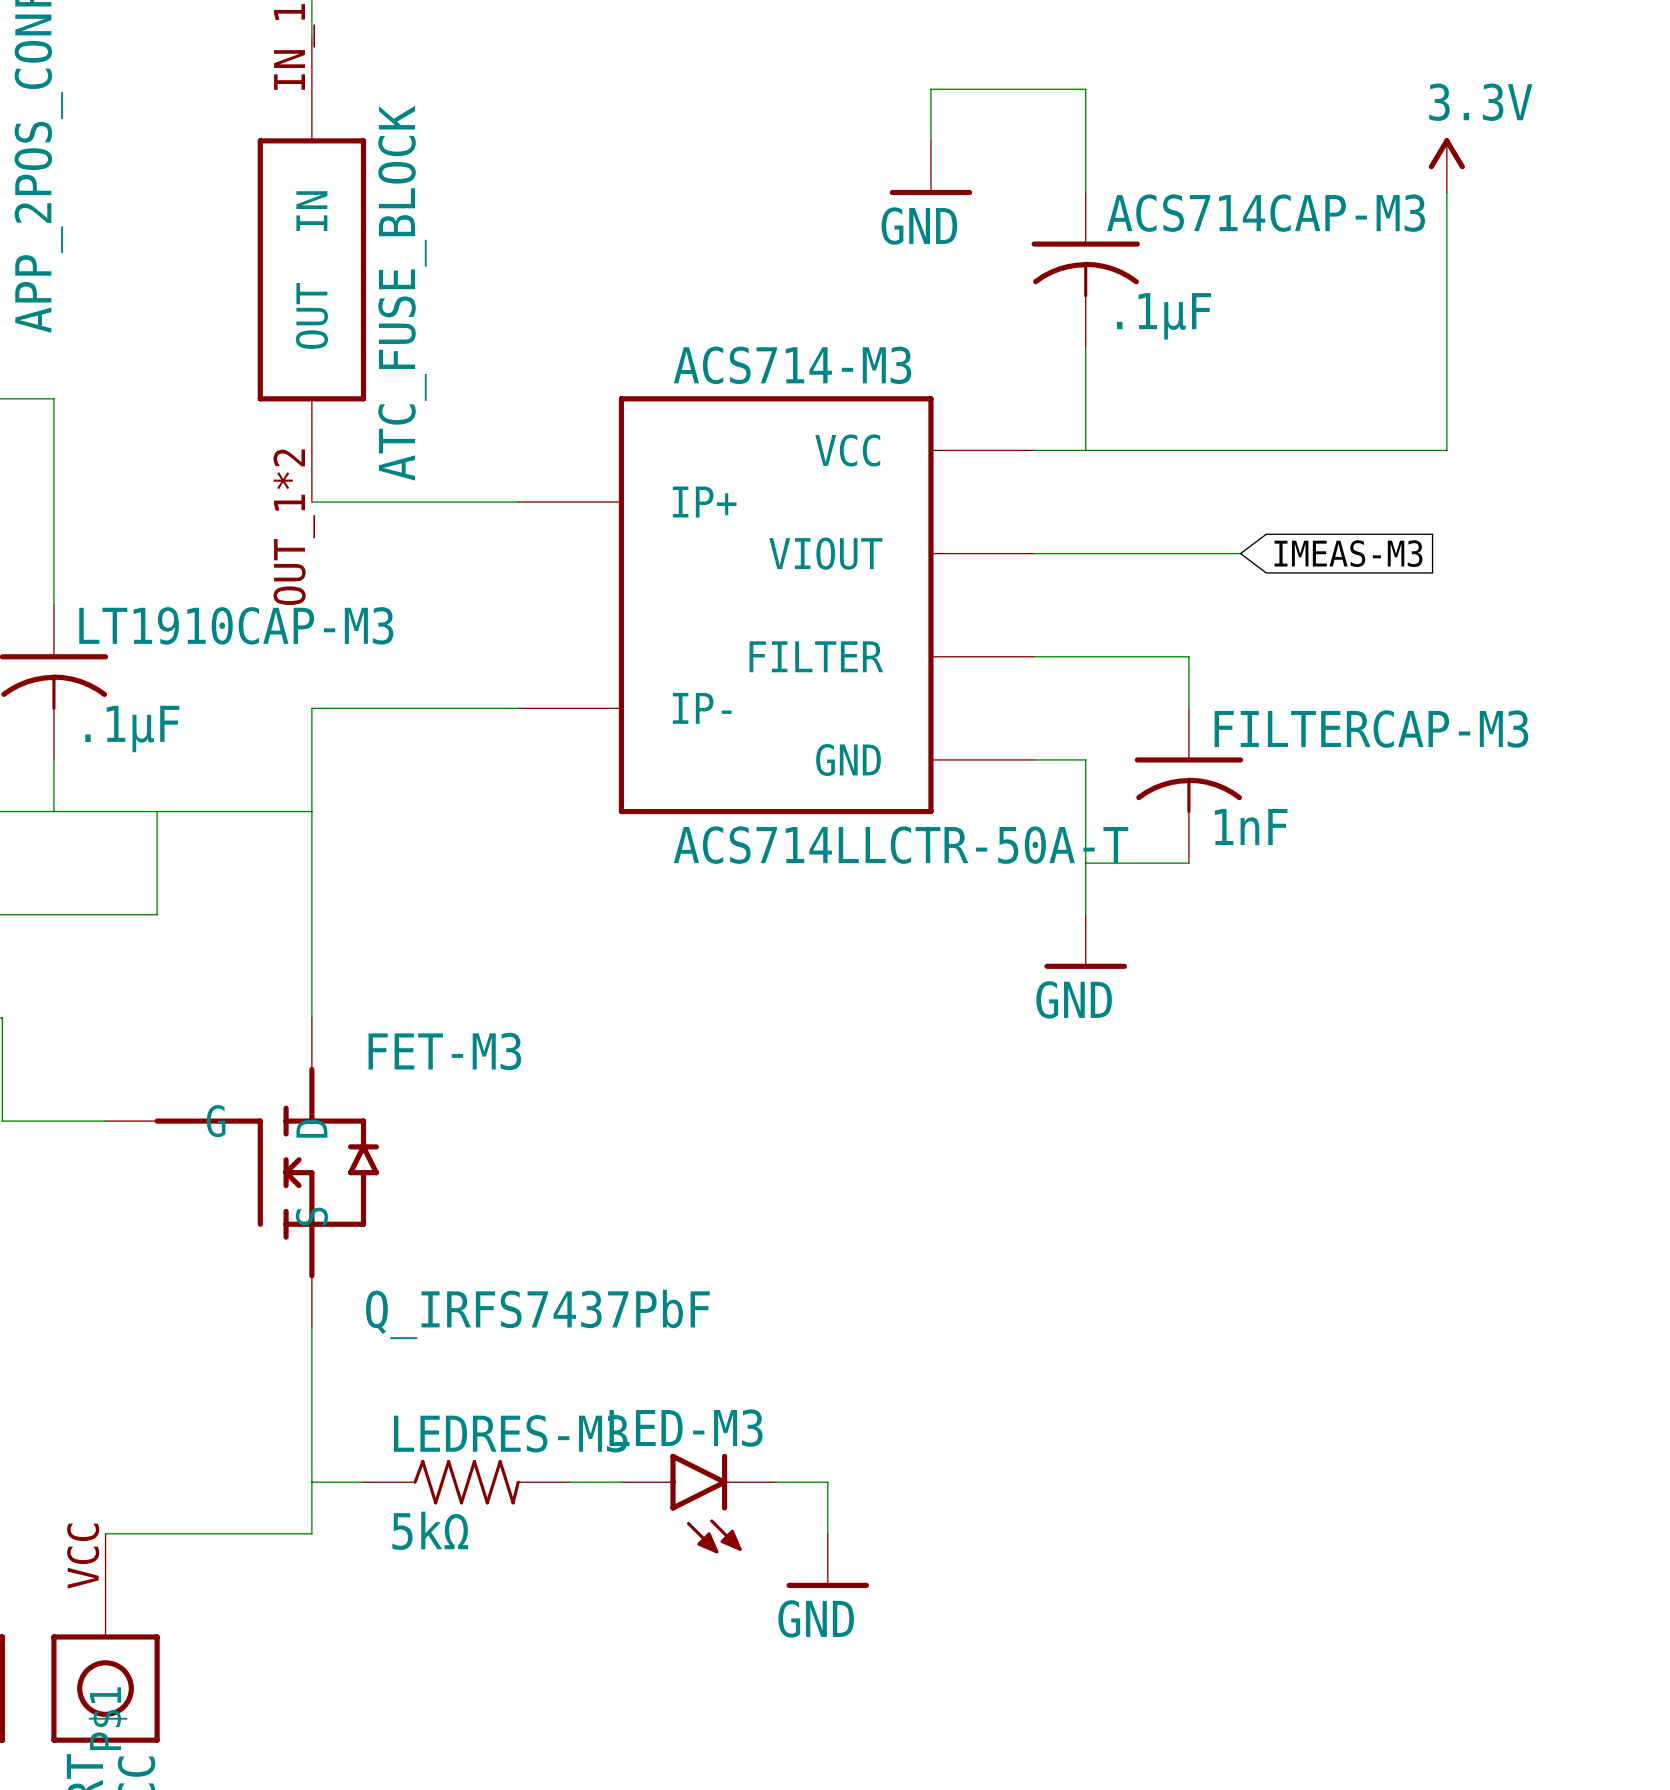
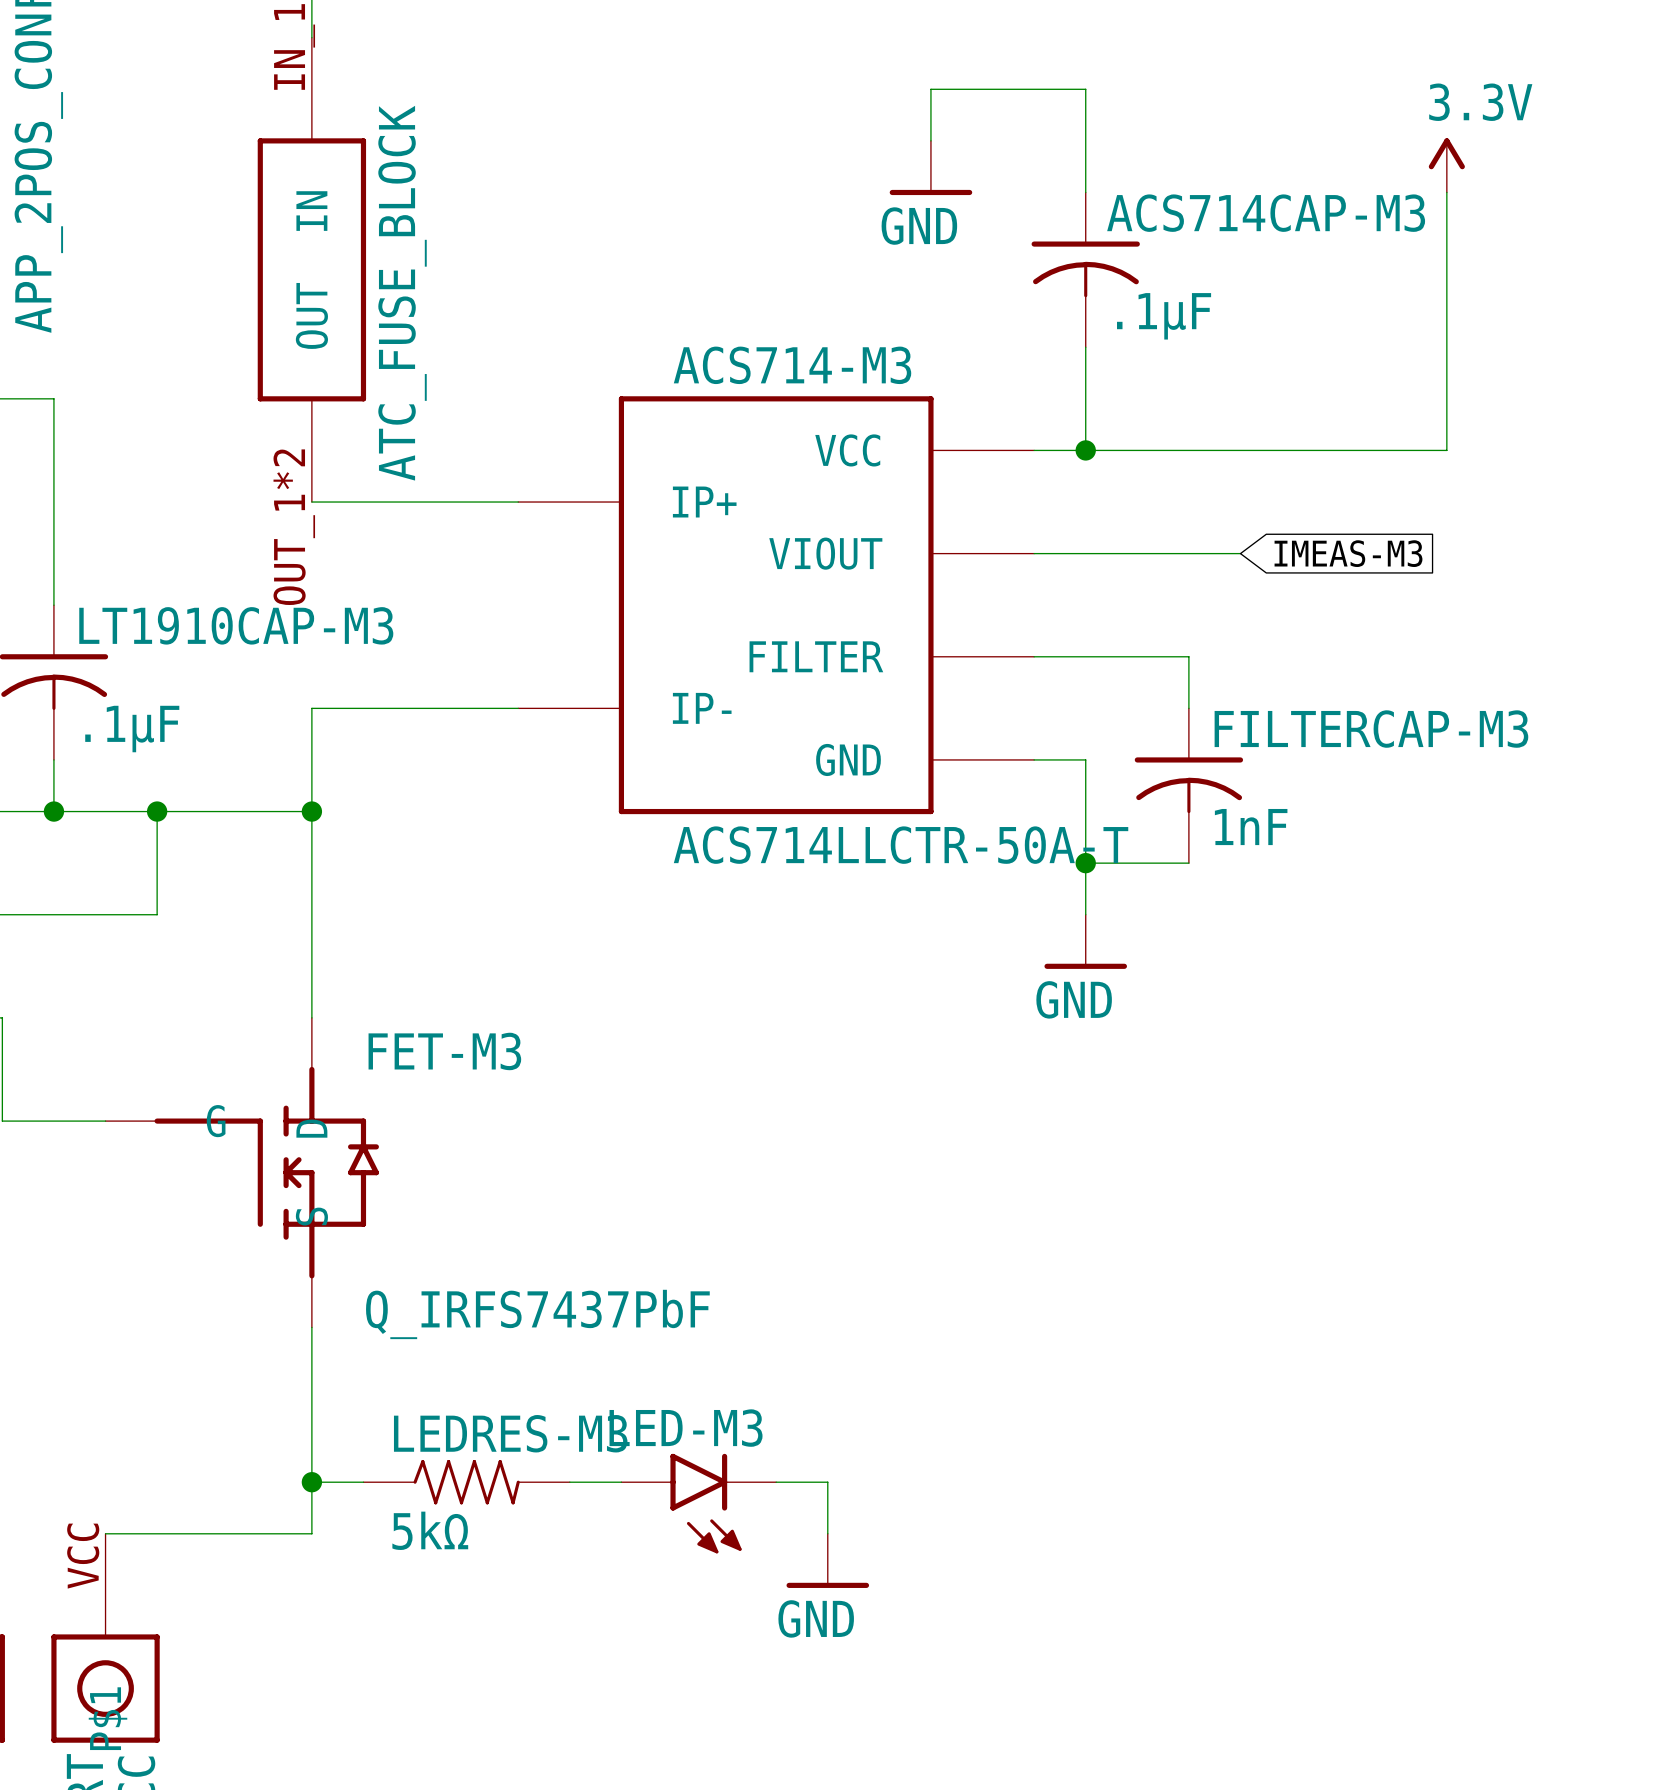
junction: none -> (1085, 450)
junction: none -> (53, 811)
junction: none -> (157, 811)
junction: none -> (311, 811)
junction: none -> (1085, 863)
junction: none -> (311, 1482)

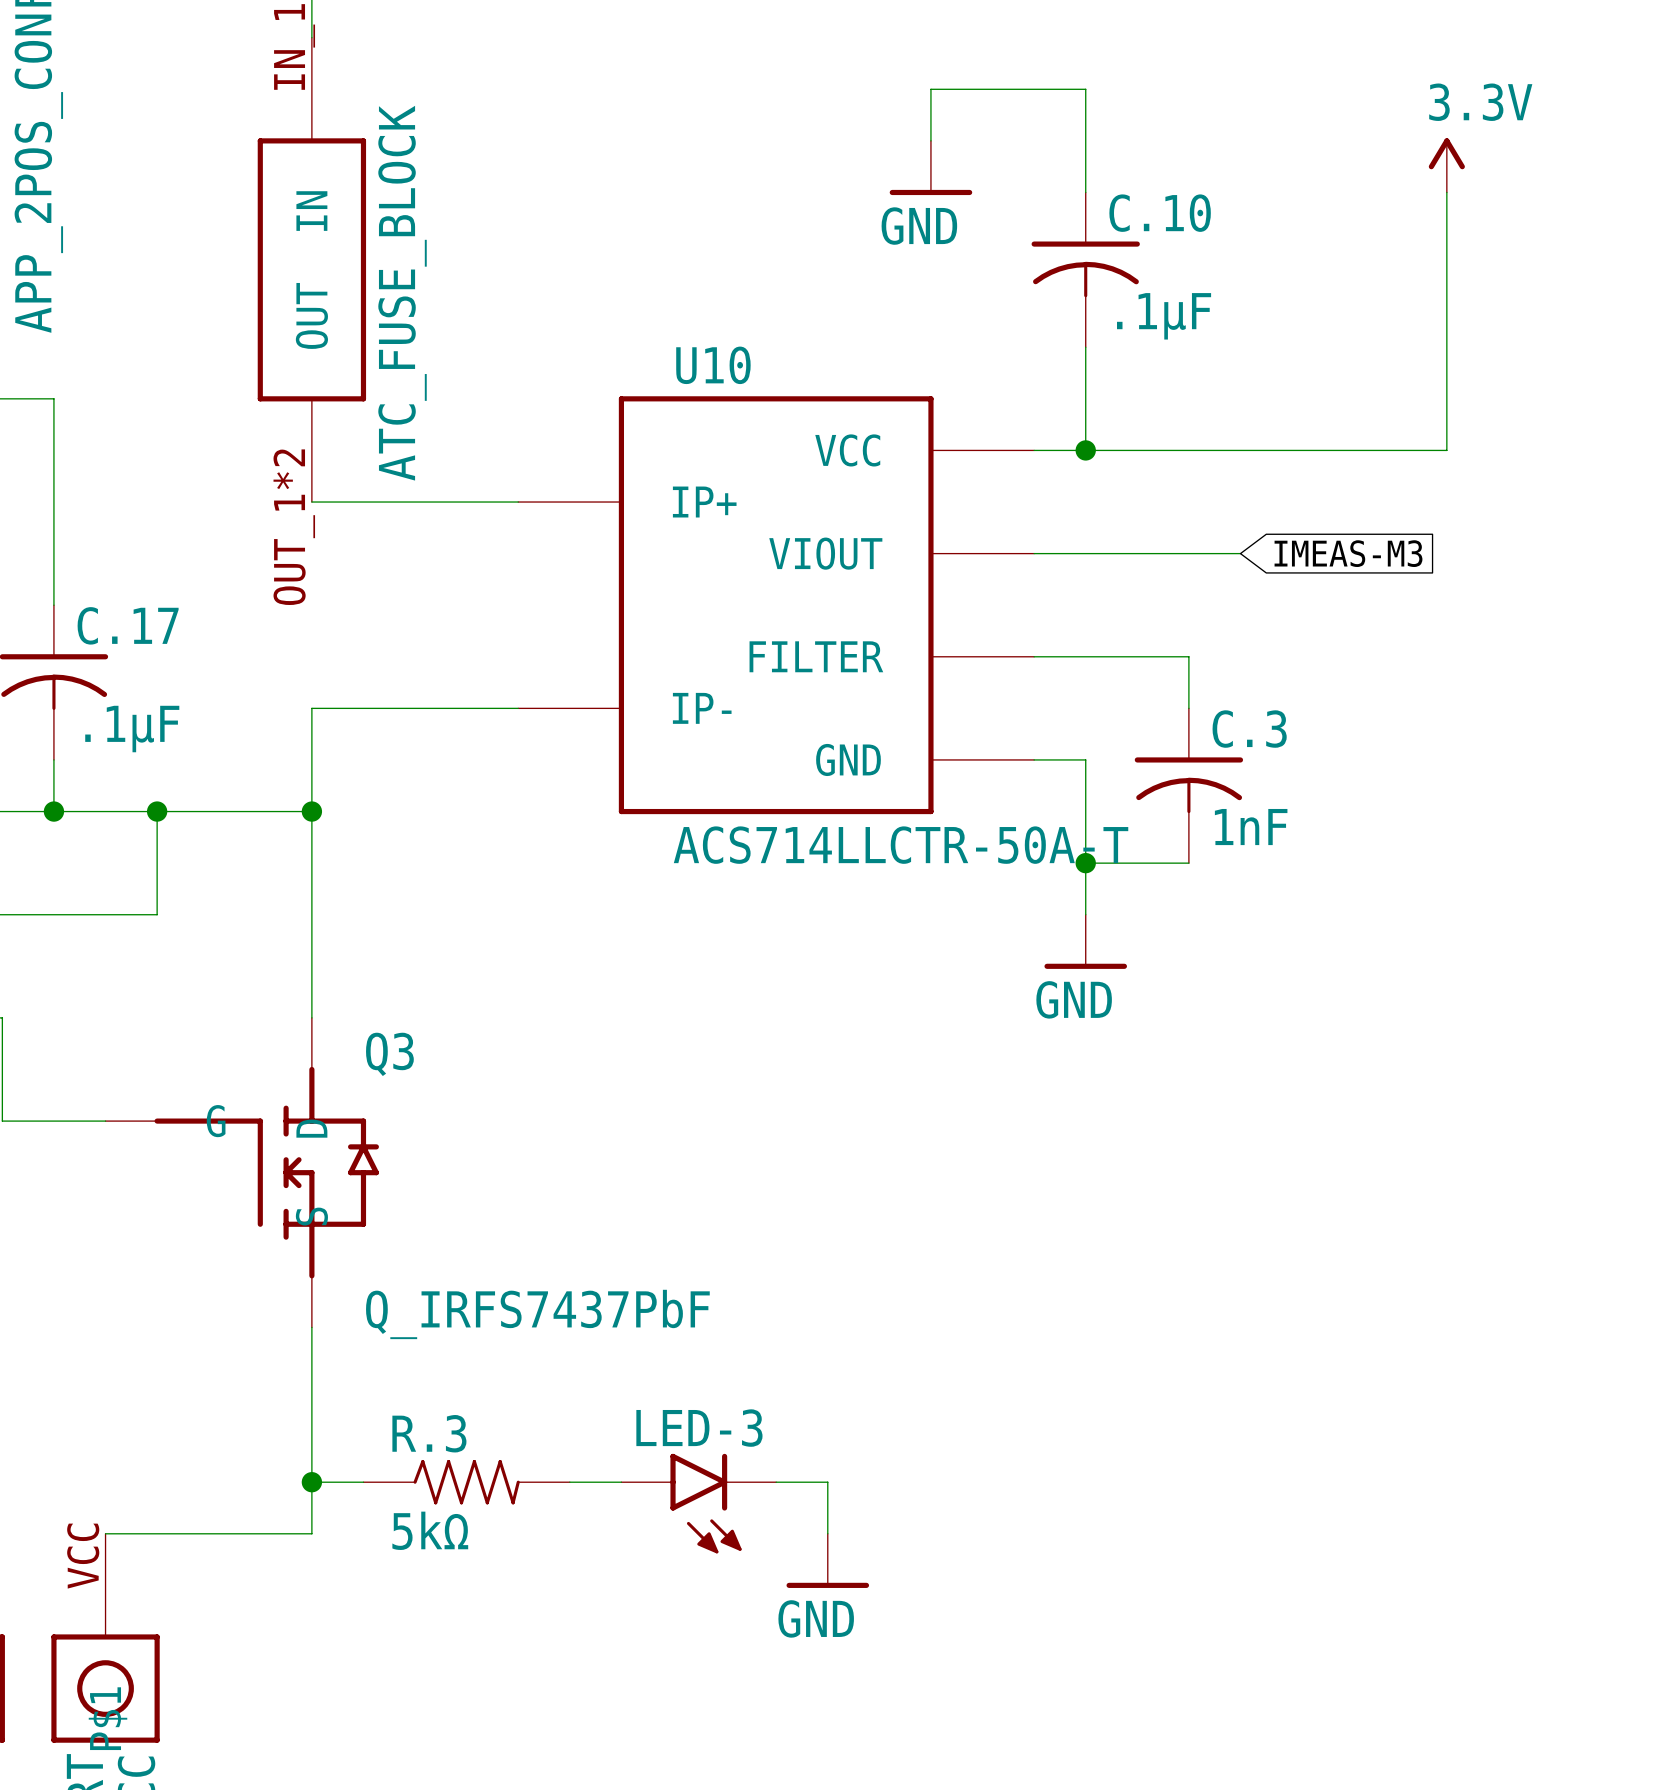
ACS714CAP-M3 name: ACS714CAP-M3 (1266, 213) -> C.10 (1160, 213)
ACS714-M3 name: ACS714-M3 (792, 365) -> U10 (713, 365)
LT1910CAP-M3 name: LT1910CAP-M3 (236, 625) -> C.17 (128, 625)
FILTERCAP-M3 name: FILTERCAP-M3 (1371, 729) -> C.3 (1249, 729)
FET-M3 name: FET-M3 (444, 1051) -> Q3 (389, 1054)
LED-M3 name: LED-M3 (686, 1428) -> LED-3 (699, 1428)
LEDRES-M3 name: LEDRES-M3 (510, 1433) -> R.3 (429, 1433)

